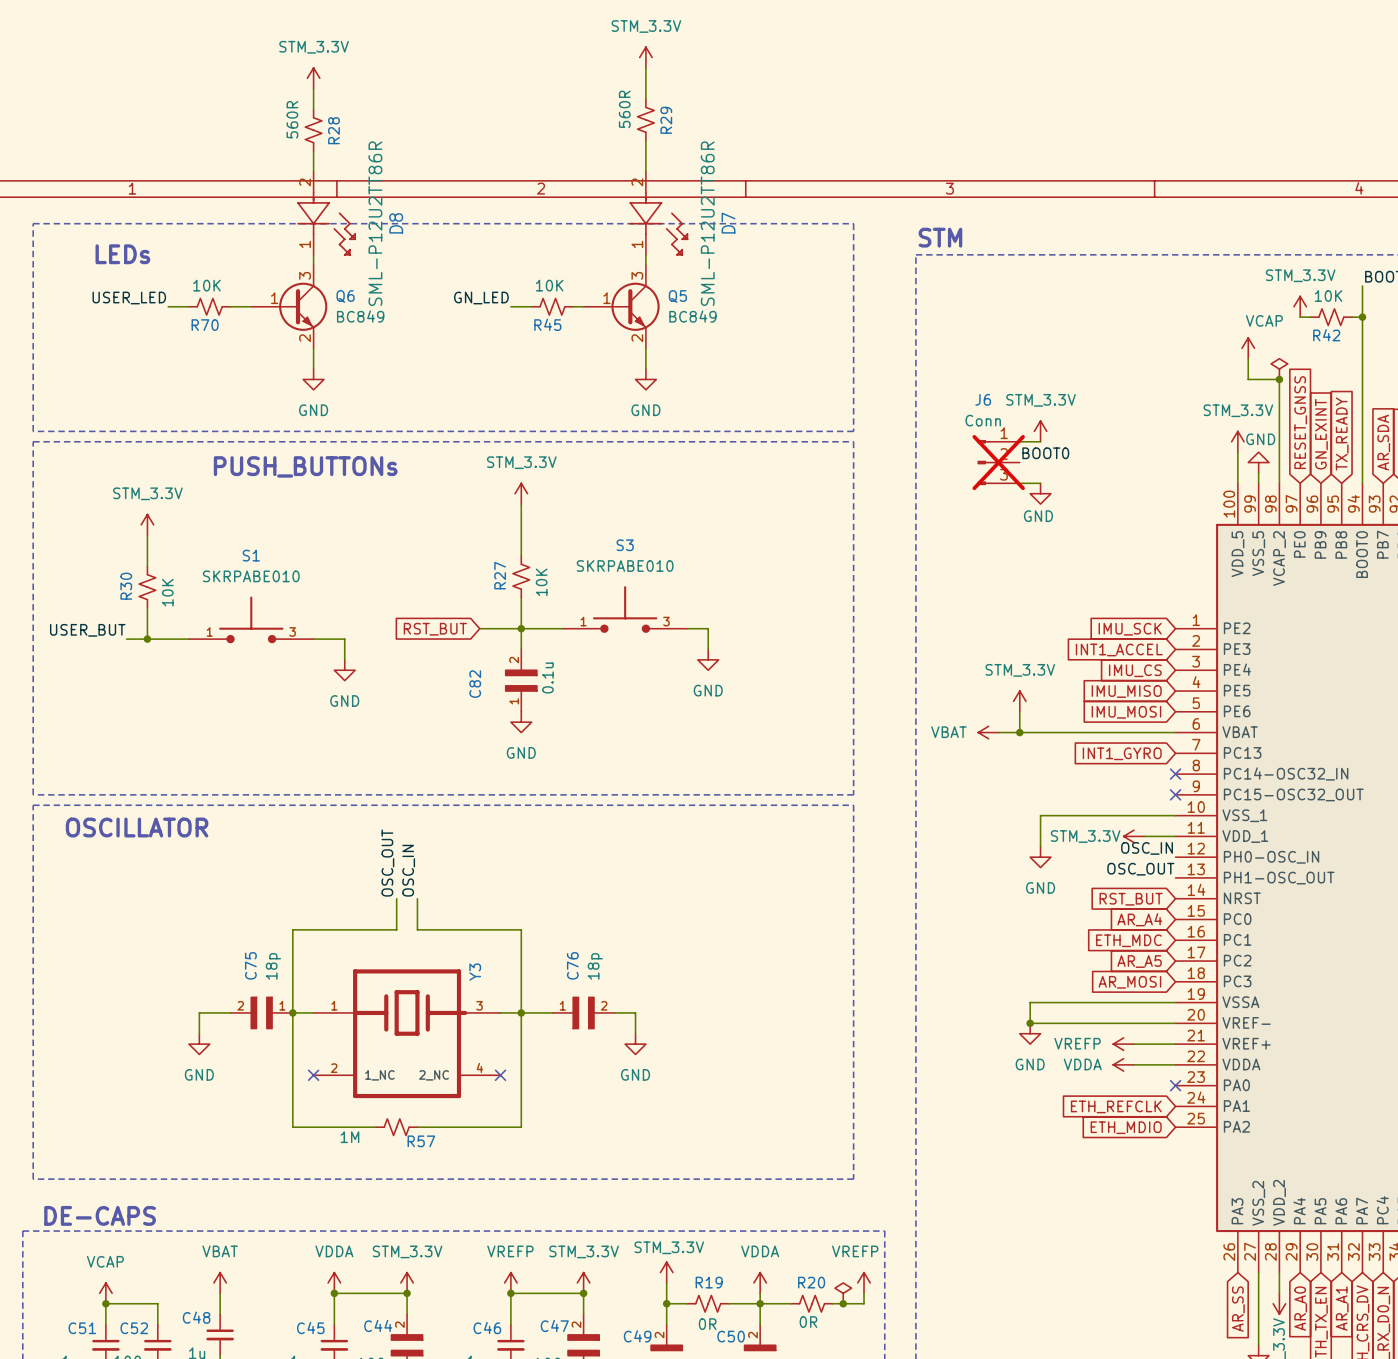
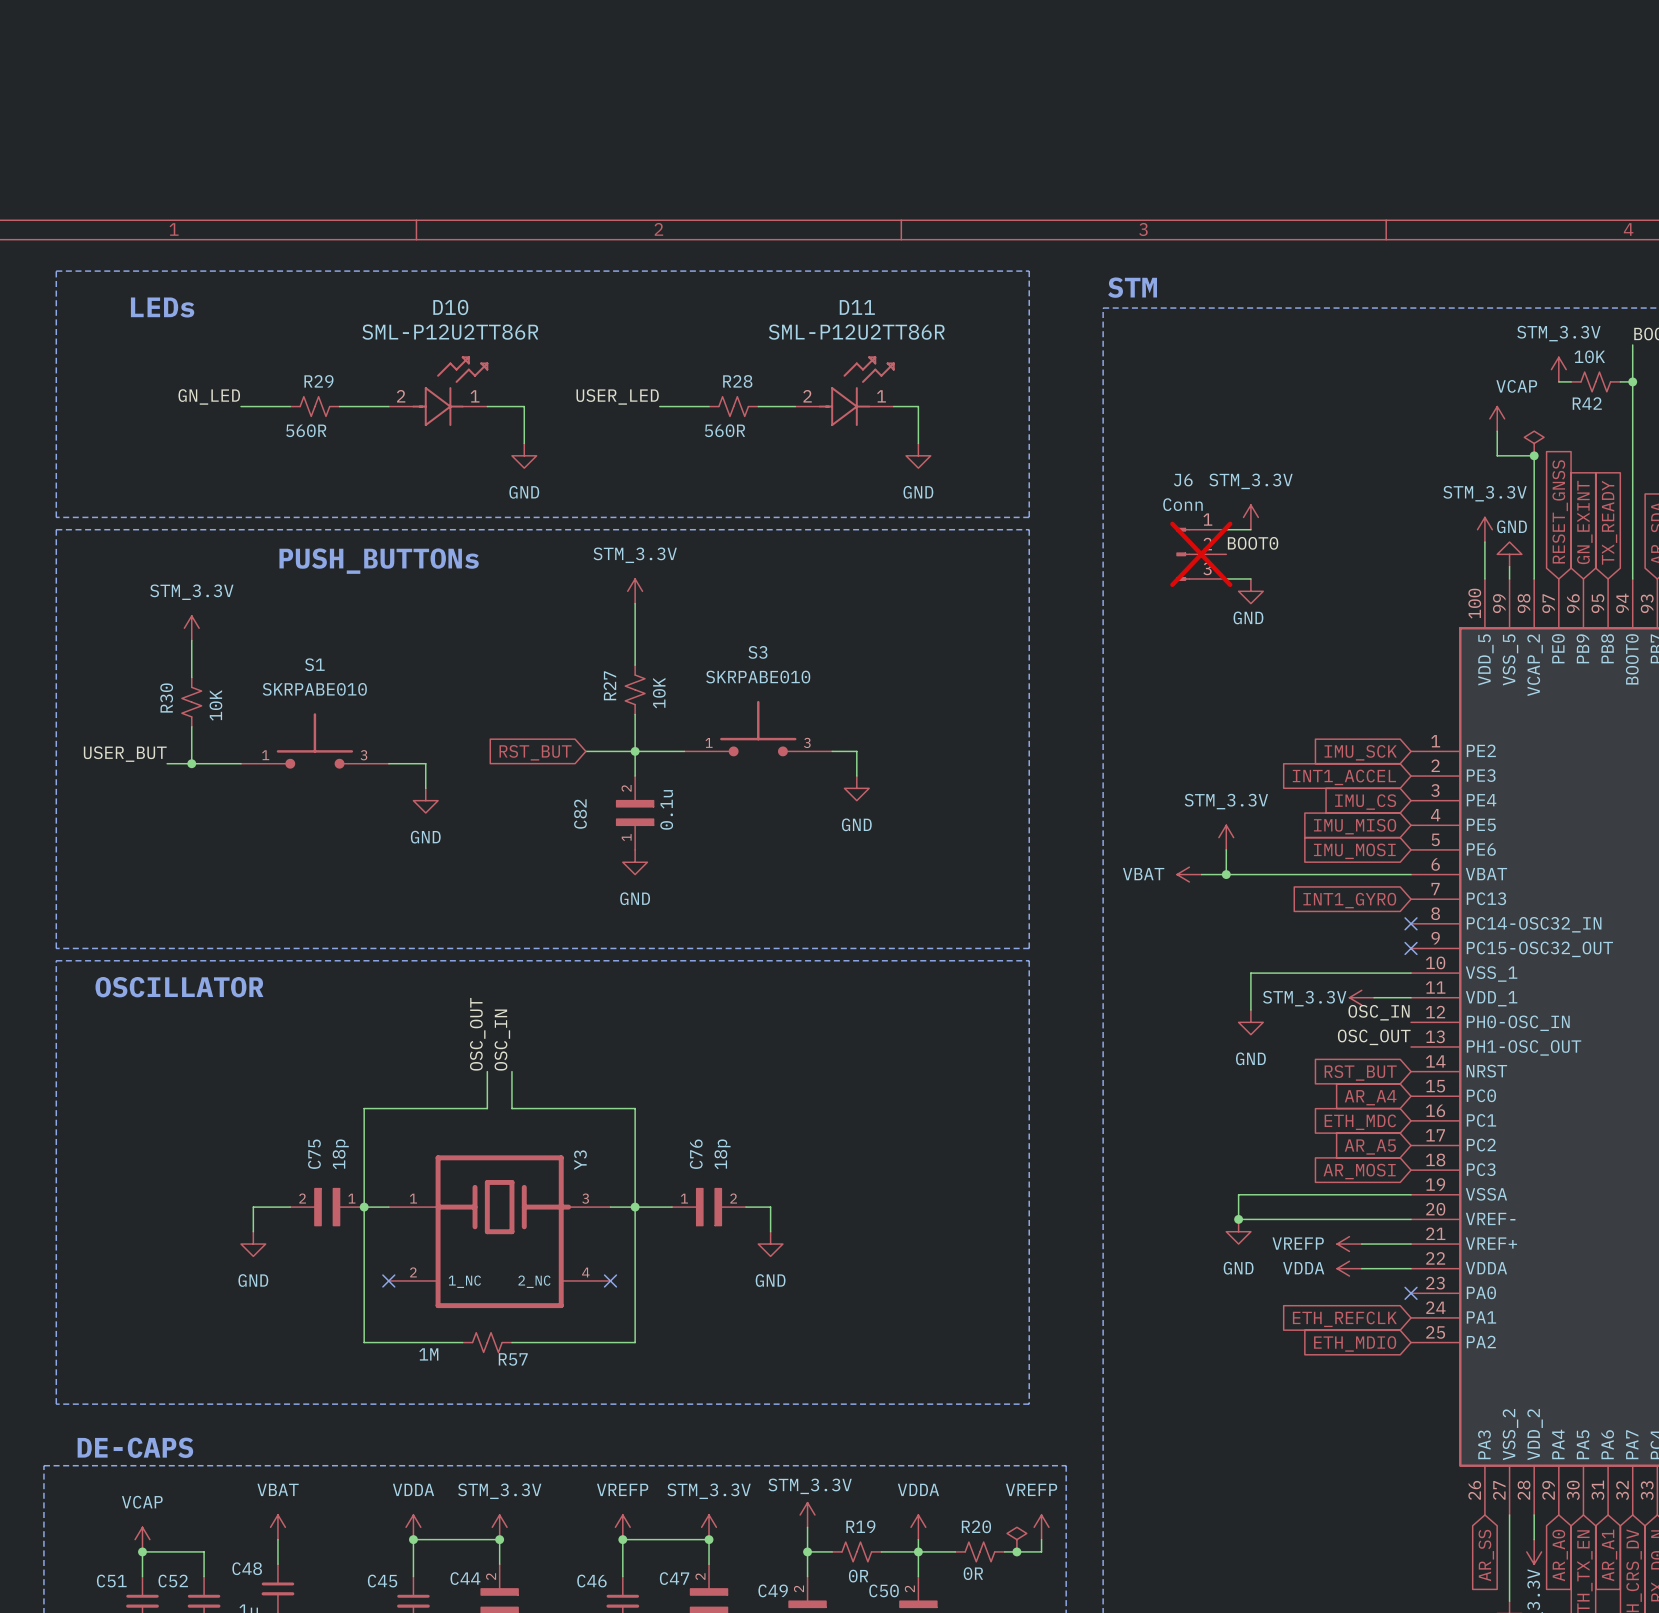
power symbol: STM_3.3V (645, 57) -> none
wire: (645, 67) (645, 99) -> none
power symbol: STM_3.3V (313, 78) -> none
wire: (313, 88) (313, 109) -> none
R29 value position: 560R (624, 109) -> 560R (306, 430)
R28 value position: 560R (292, 119) -> 560R (724, 430)
R29 rotation: 0° (645, 119) -> 90° clockwise (314, 406)
R29 position: (645, 119) -> (314, 406)
R29 name position: R29 (666, 120) -> R29 (318, 381)
R28 rotation: 0° (313, 130) -> 90° clockwise (733, 406)
R28 position: (313, 130) -> (733, 406)
R28 name position: R28 (333, 130) -> R28 (737, 381)
wire: (645, 140) (645, 171) -> none
wire: (313, 151) (313, 171) -> none
D8: SML-P12U2TT86R (326, 213) -> none
D7: SML-P12U2TT86R (658, 213) -> none
wire: (313, 254) (313, 265) -> none
wire: (645, 254) (645, 265) -> none
label: USER_LED (129, 298) -> none
label: GN_LED (481, 298) -> none
wire: (168, 306) (188, 306) -> none
R70: 10K (209, 306) -> none
wire: (230, 306) (251, 306) -> none
Q6: BC849 (289, 306) -> none
wire: (510, 306) (531, 306) -> none
R45: 10K (552, 306) -> none
wire: (573, 306) (583, 306) -> none
Q5: BC849 (621, 306) -> none
D10: none -> SML-P12U2TT86R (438, 391)
D11: none -> SML-P12U2TT86R (844, 391)
label: none -> GN_LED (209, 396)
label: none -> USER_LED (617, 396)
wire: none -> (241, 406) (290, 406)
wire: none -> (339, 406) (388, 406)
wire: none -> (487, 406) (524, 406) (524, 443)
wire: none -> (659, 406) (709, 406)
wire: none -> (758, 406) (795, 406)
wire: none -> (893, 406) (918, 406) (918, 443)
wire: (313, 348) (313, 369) -> none
wire: (645, 348) (645, 369) -> none
power symbol: GND (313, 379) -> none
power symbol: none -> GND (524, 455)
power symbol: GND (645, 379) -> none
power symbol: none -> GND (918, 455)

